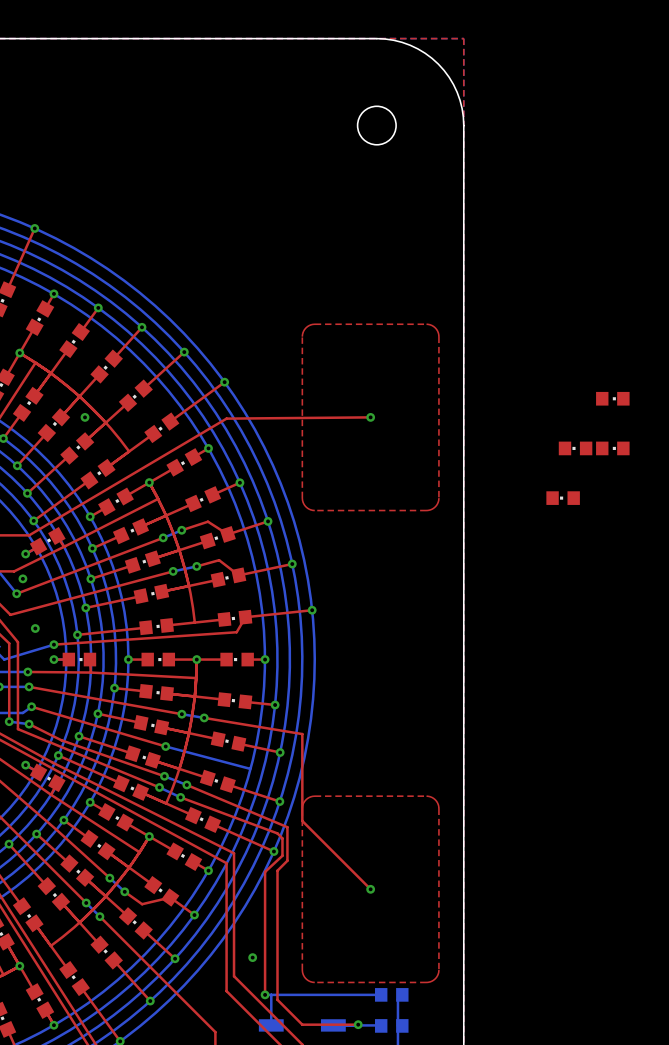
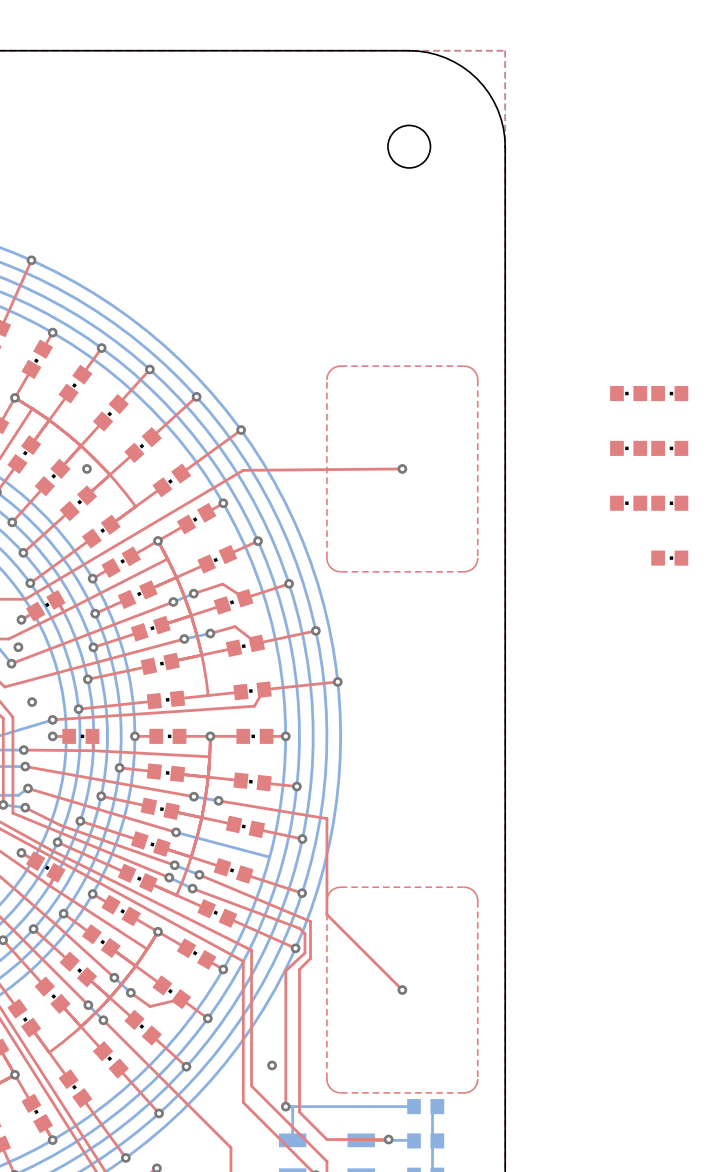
part: none -> (628, 393)
part: none -> (669, 393)
part: none -> (628, 448)
part rotation: 0° (563, 498) -> 180° (669, 558)
part position: (563, 498) -> (669, 558)

